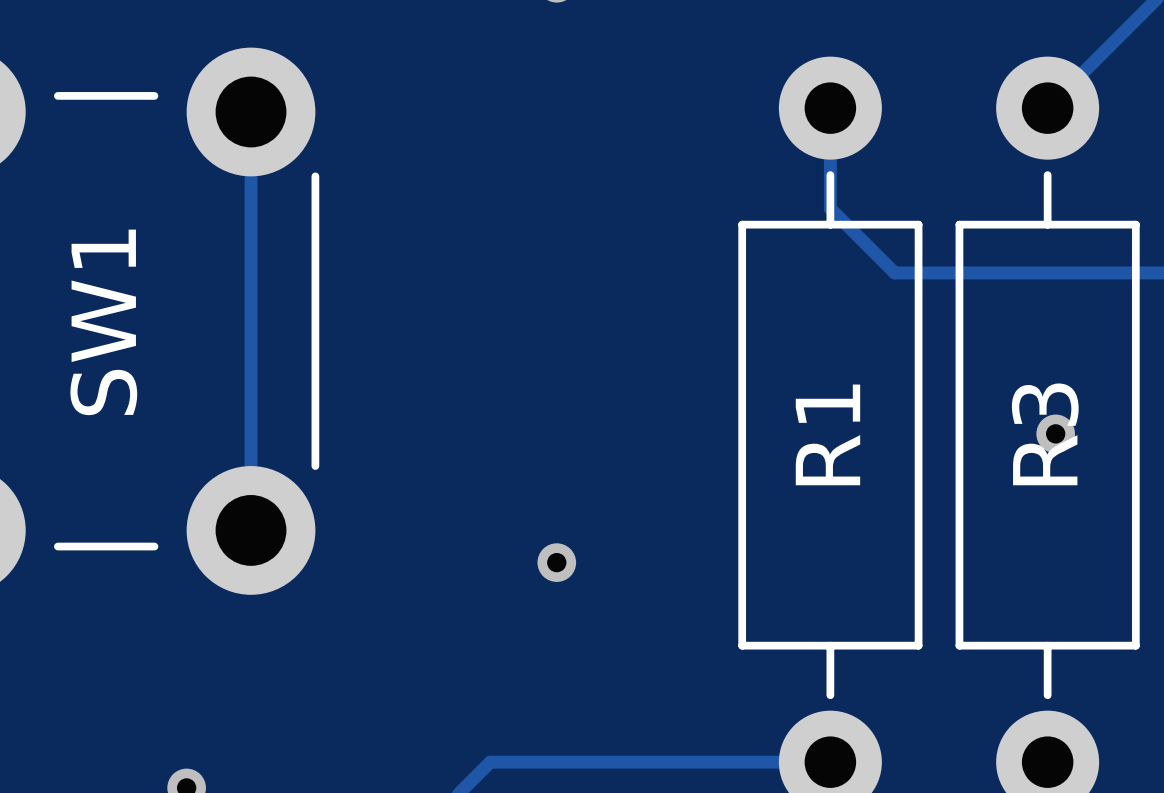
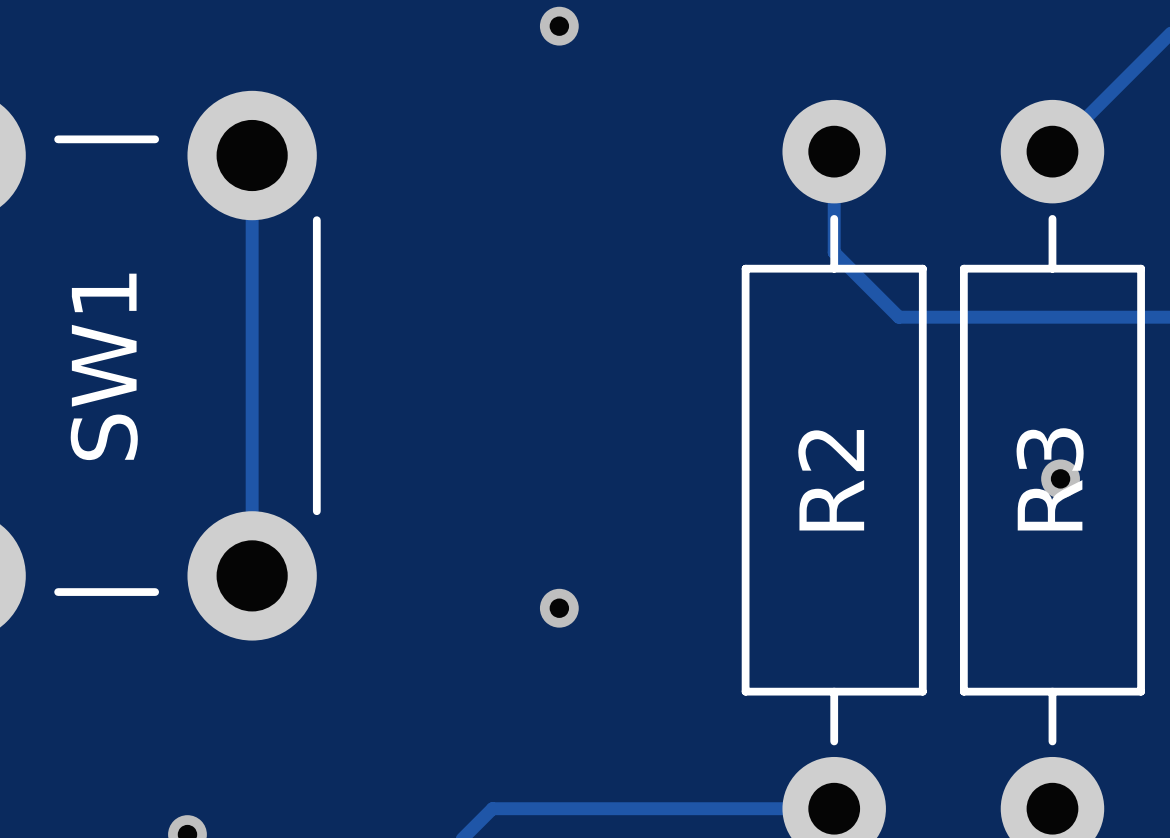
R1 name: R1 (827, 434) -> R2 (831, 480)

